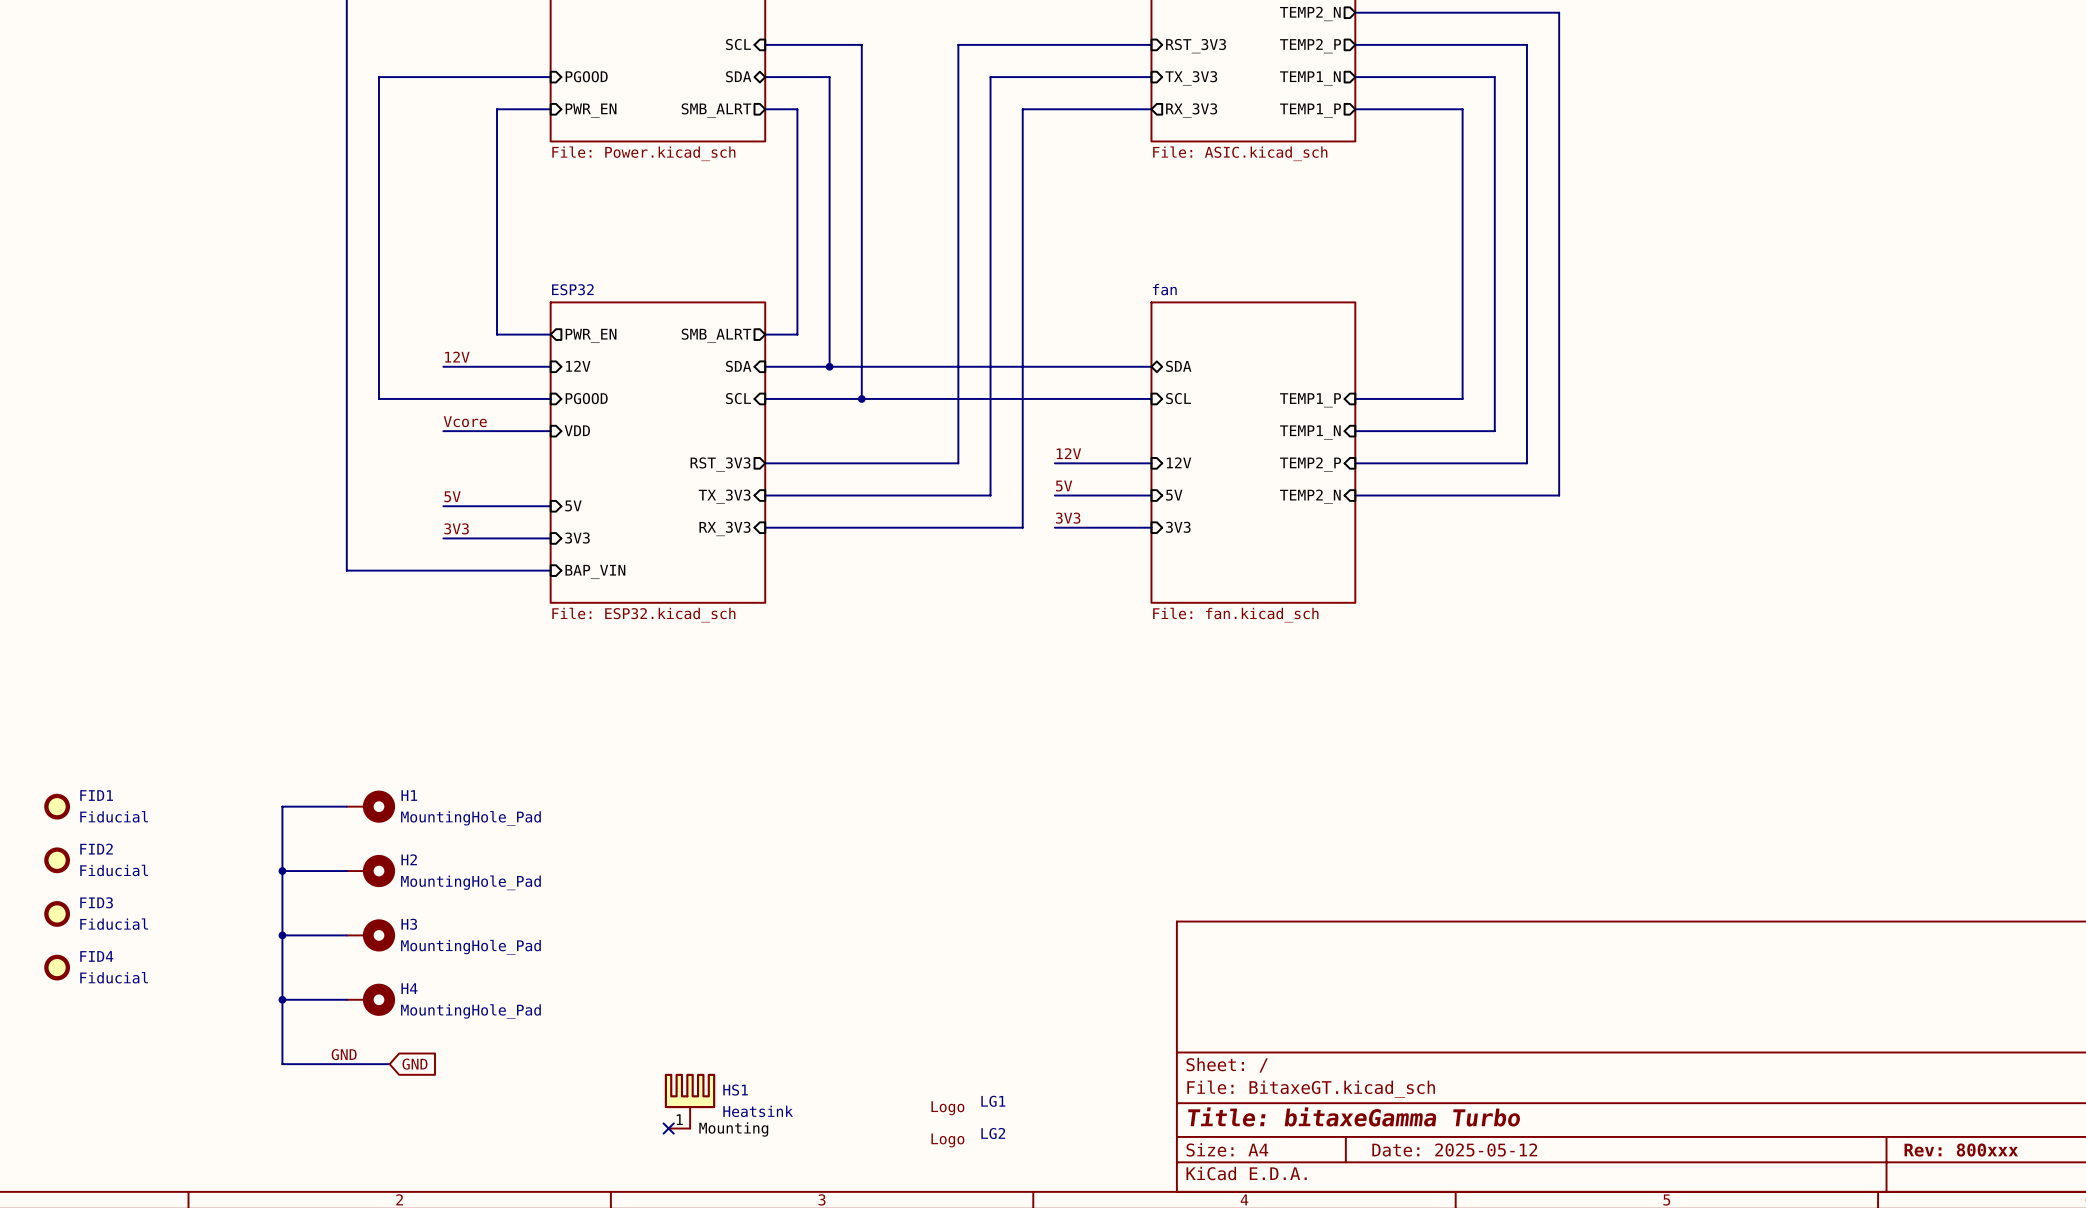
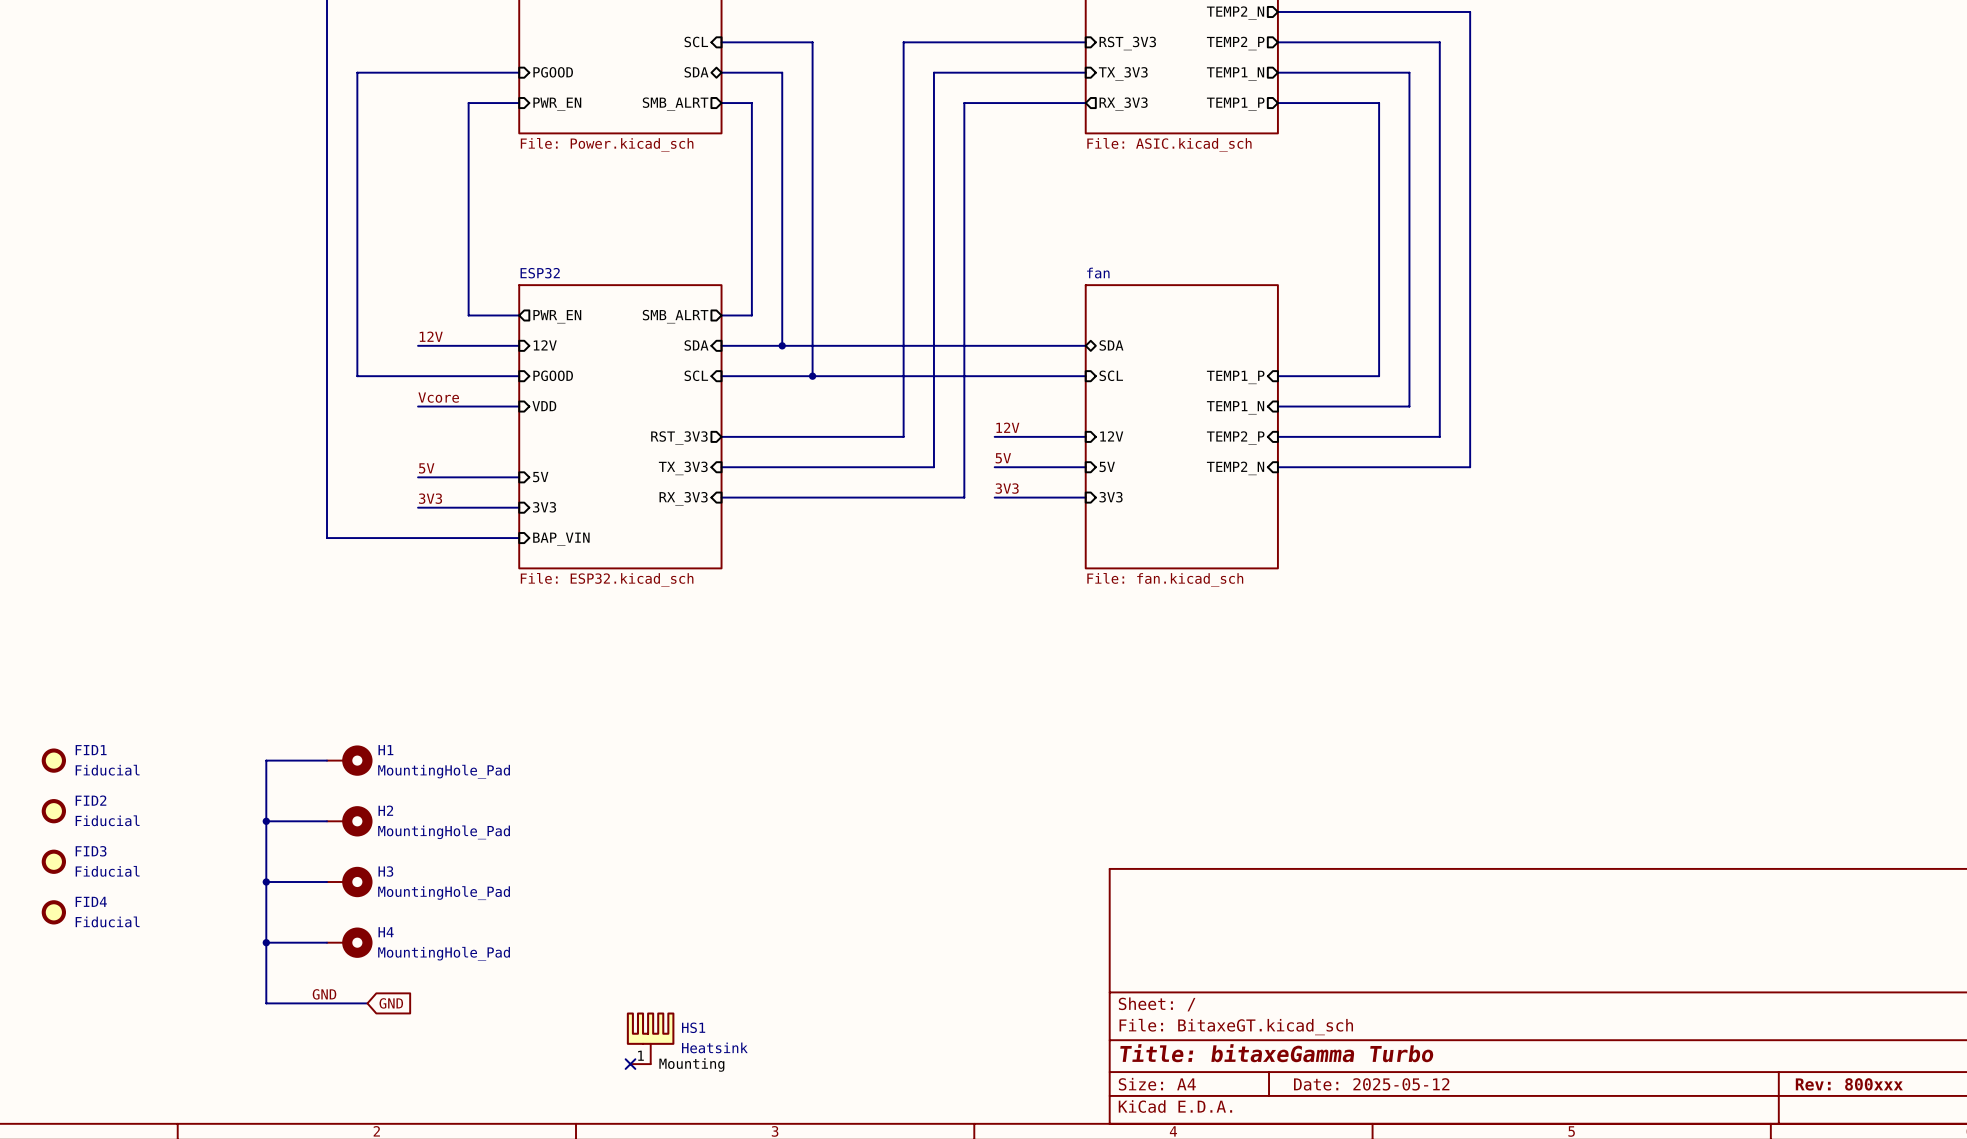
LG1: (968, 1105) -> none
LG2: (968, 1137) -> none

